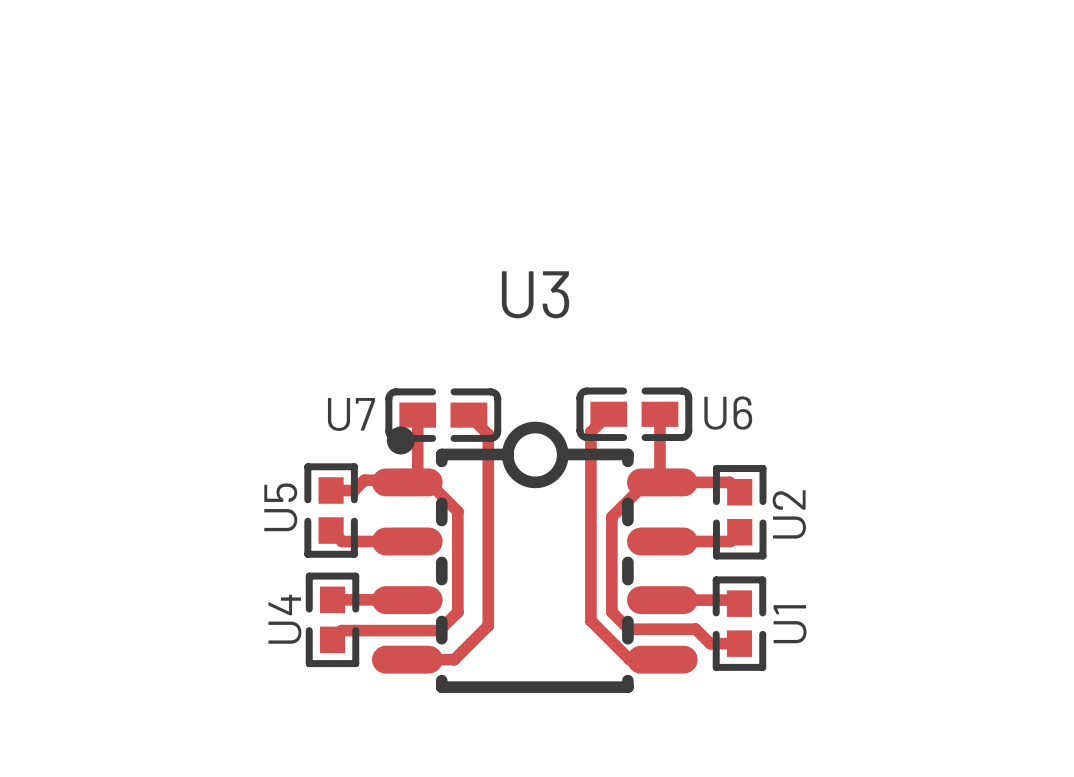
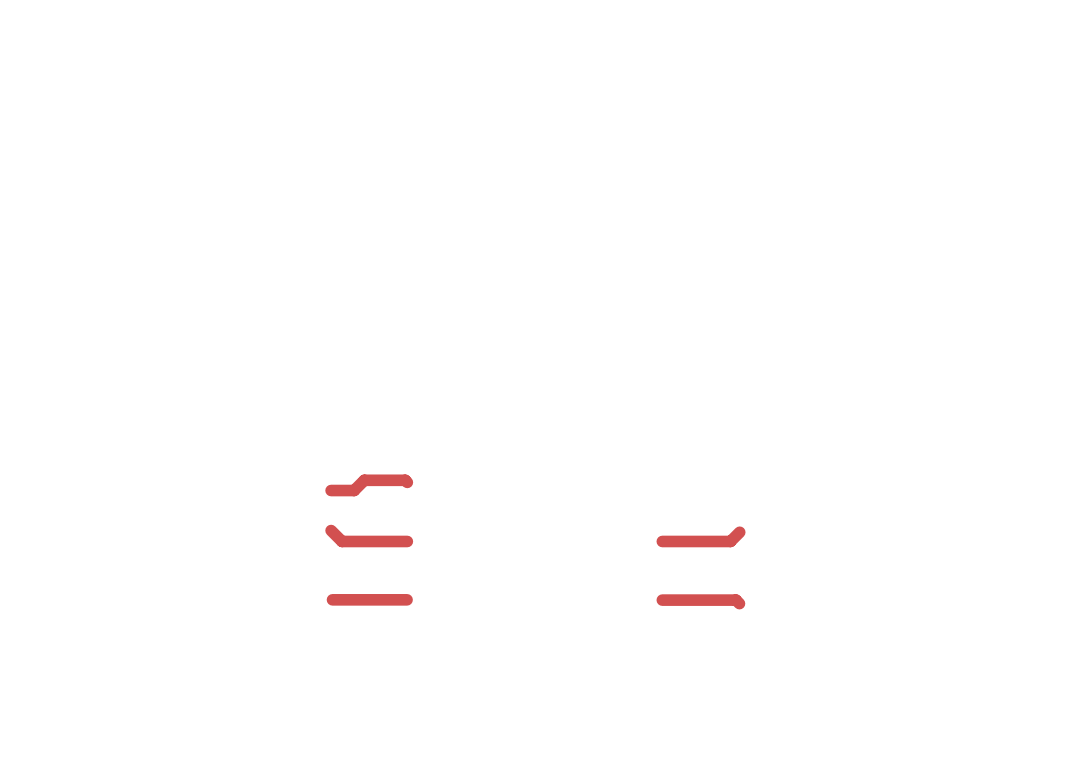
top track: (608, 414) (590, 432) (590, 620) (629, 659) (662, 659) -> none
U6: (634, 414) -> none
top track: (659, 414) (659, 480) (662, 482) -> none
top track: (417, 415) (417, 471) (407, 482) (428, 482) (457, 511) (457, 612) (439, 630) (341, 630) (332, 639) -> none
U7: (443, 415) -> none
top track: (468, 415) (488, 434) (488, 625) (454, 659) (407, 659) -> none
top track: (739, 492) (729, 482) (646, 482) (611, 517) (611, 612) (628, 629) (695, 629) (710, 643) (739, 643) -> none
U5: (331, 510) -> none
U2: (739, 512) -> none
U3: (534, 557) -> none
U4: (332, 619) -> none
U1: (739, 623) -> none

